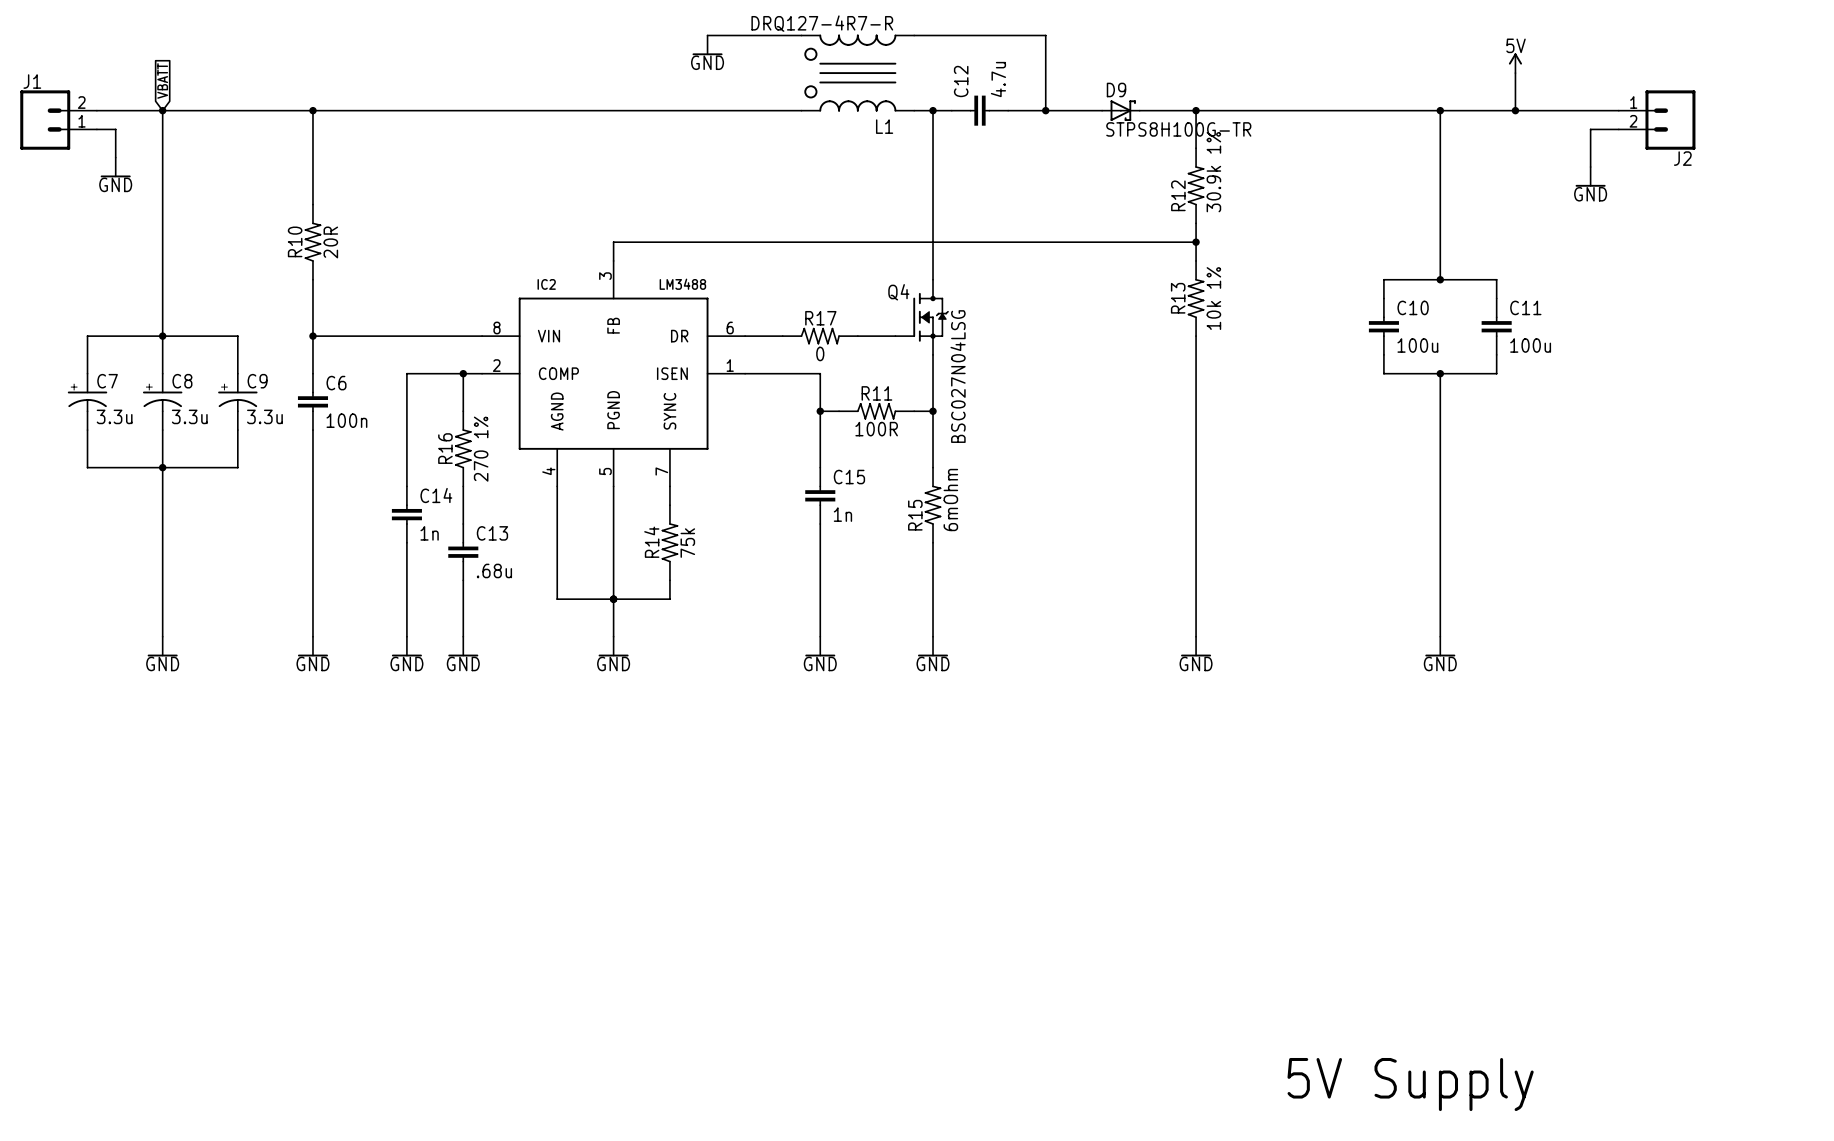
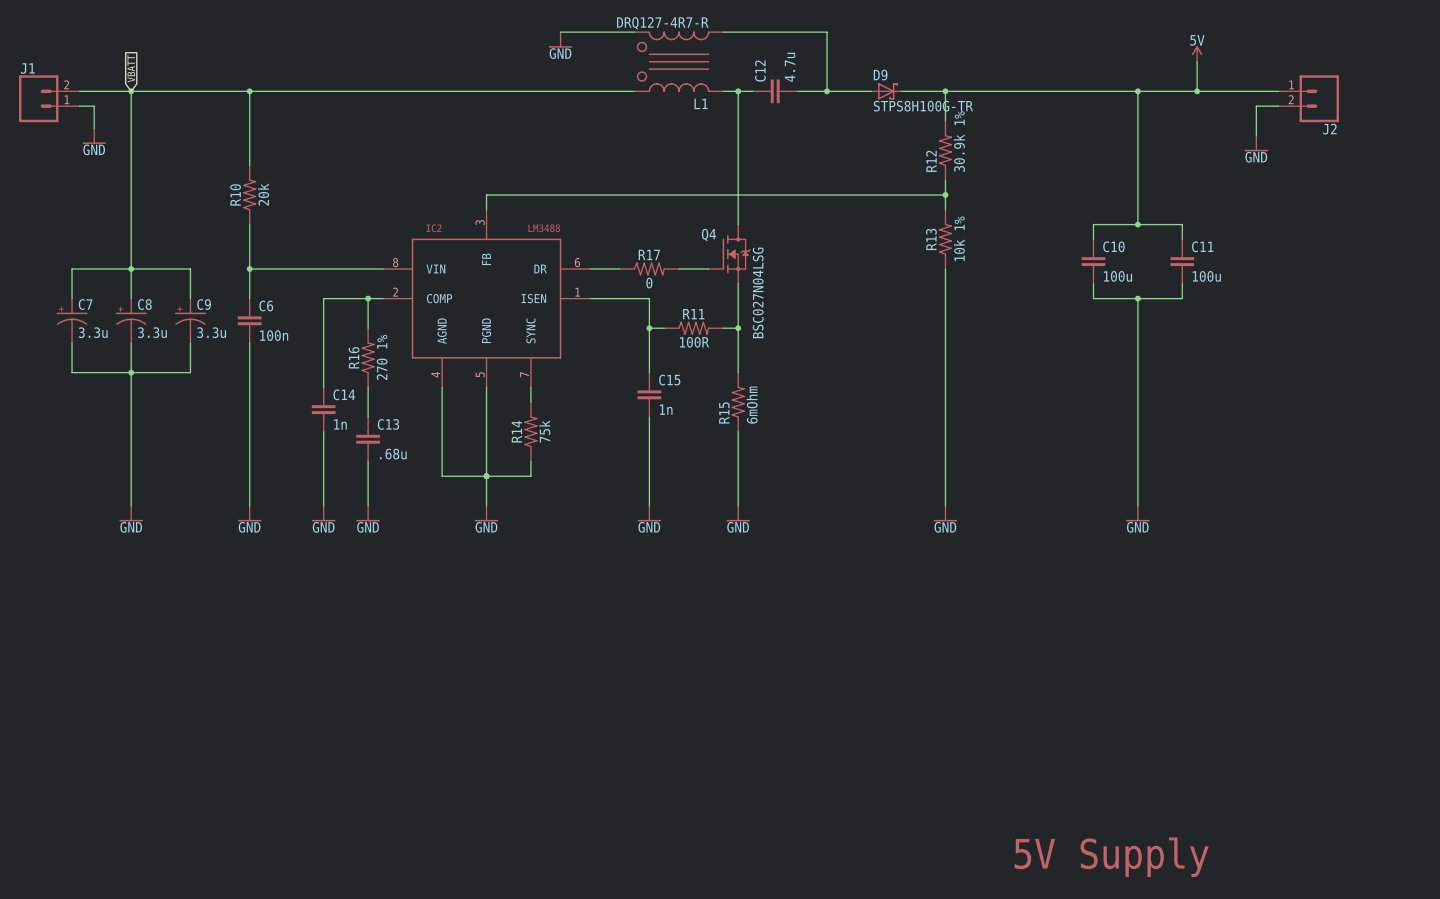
R10 value: 20R (330, 242) -> 20k (263, 194)

